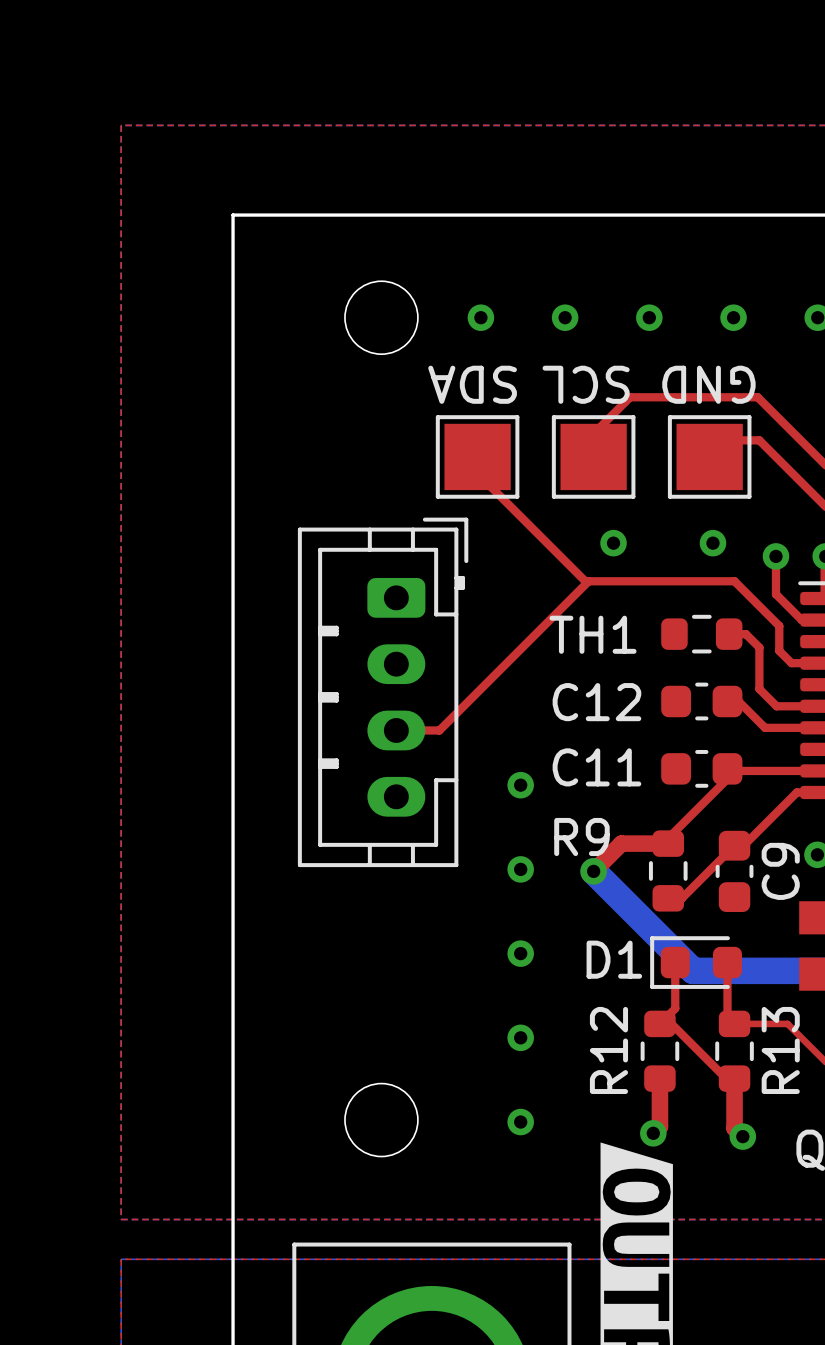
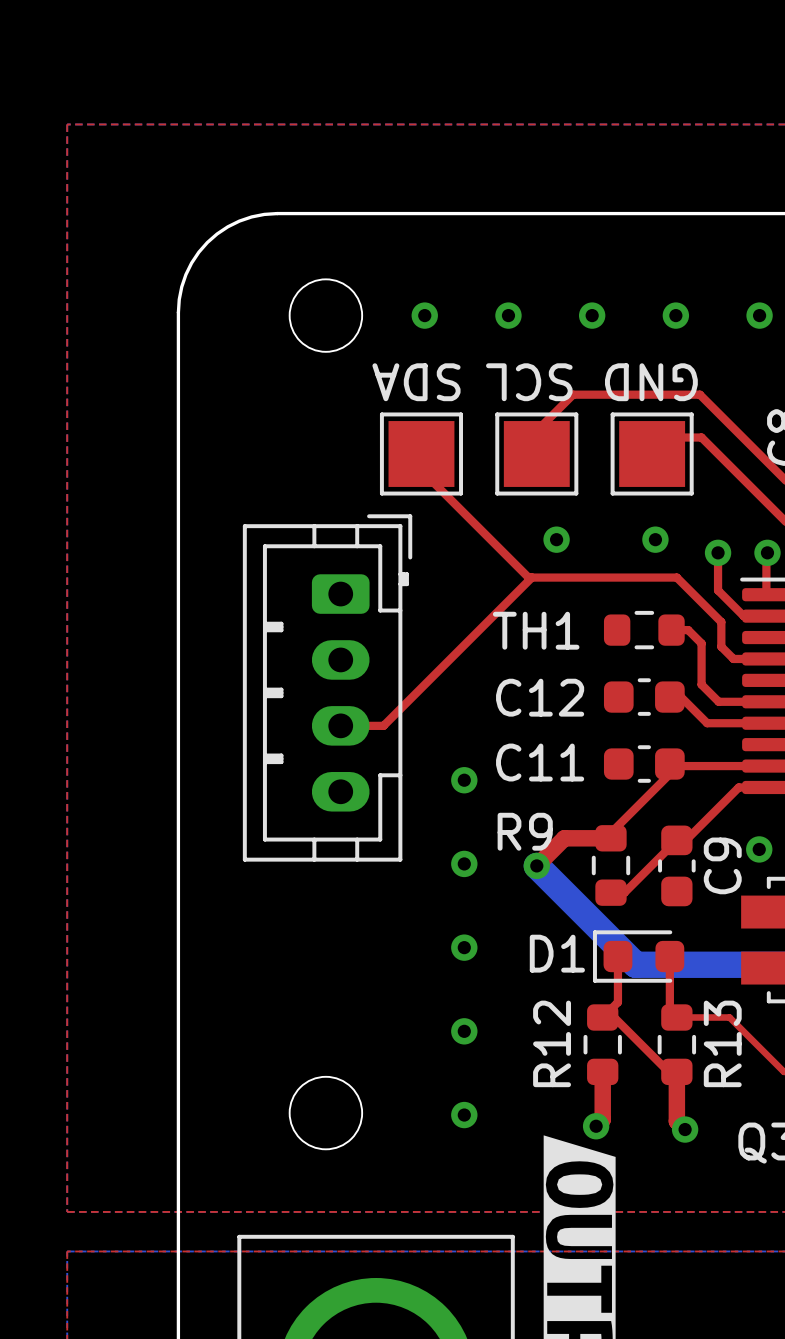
board edge: (332, 215) (233, 215) (233, 314) -> (277, 213) (251, 216) (239, 221) (217, 233) (207, 242) (191, 262) (185, 274) (179, 299) (178, 312)

